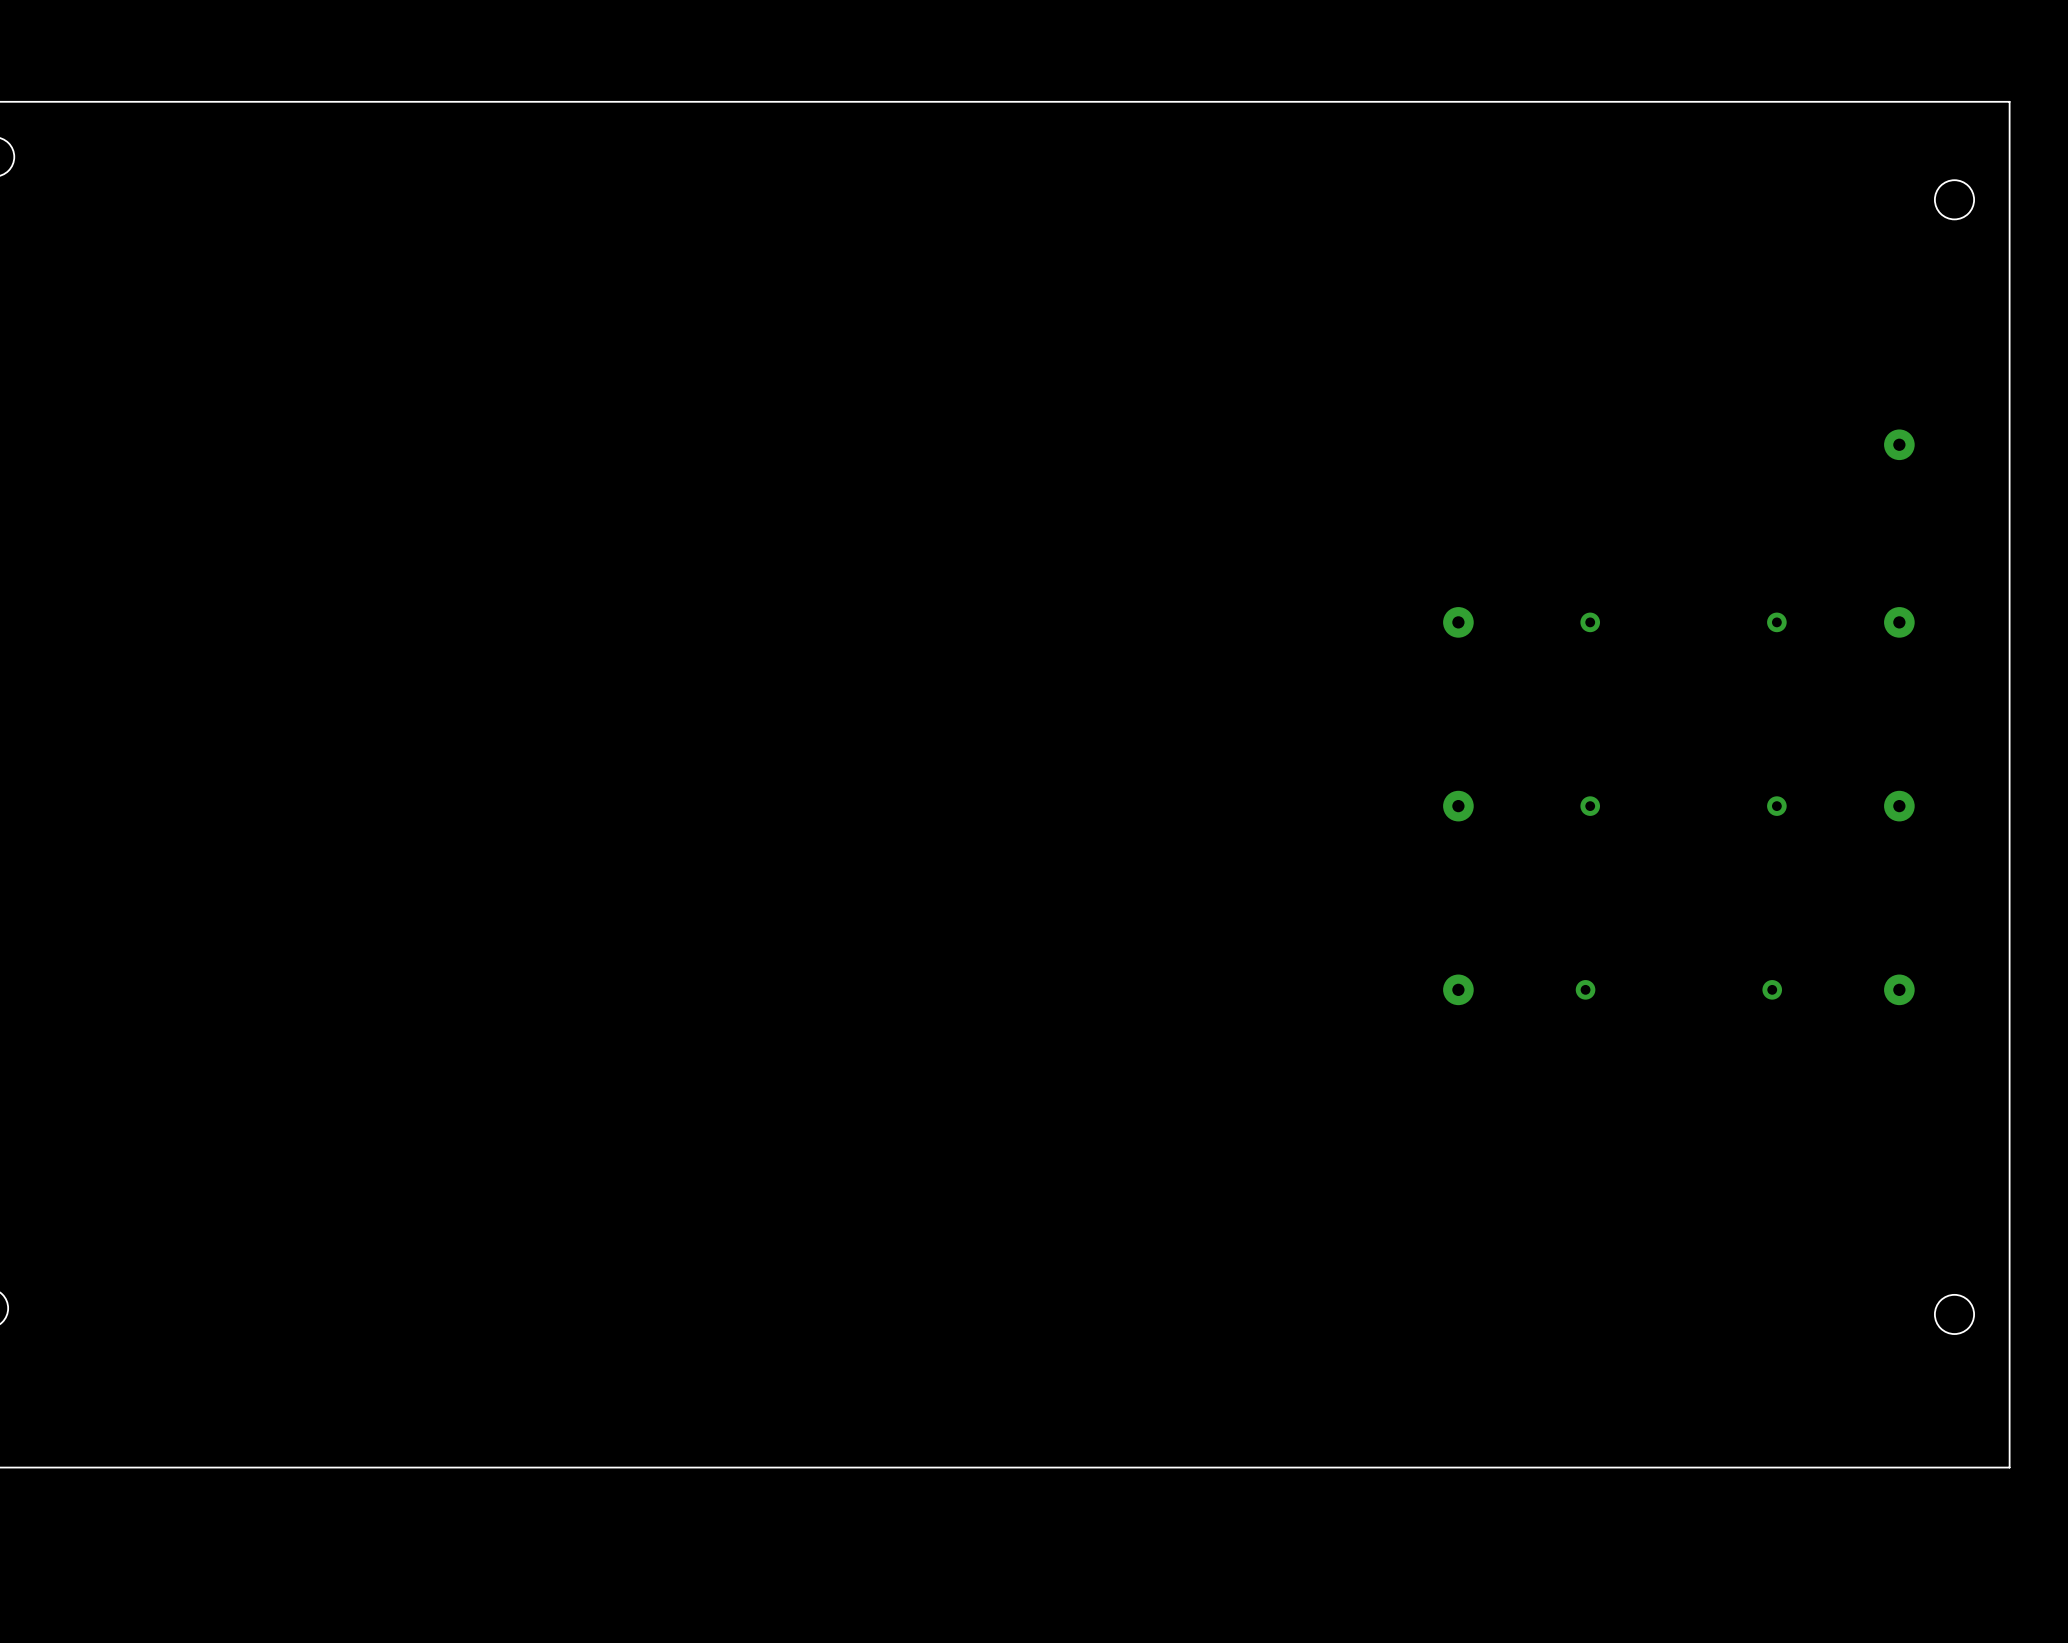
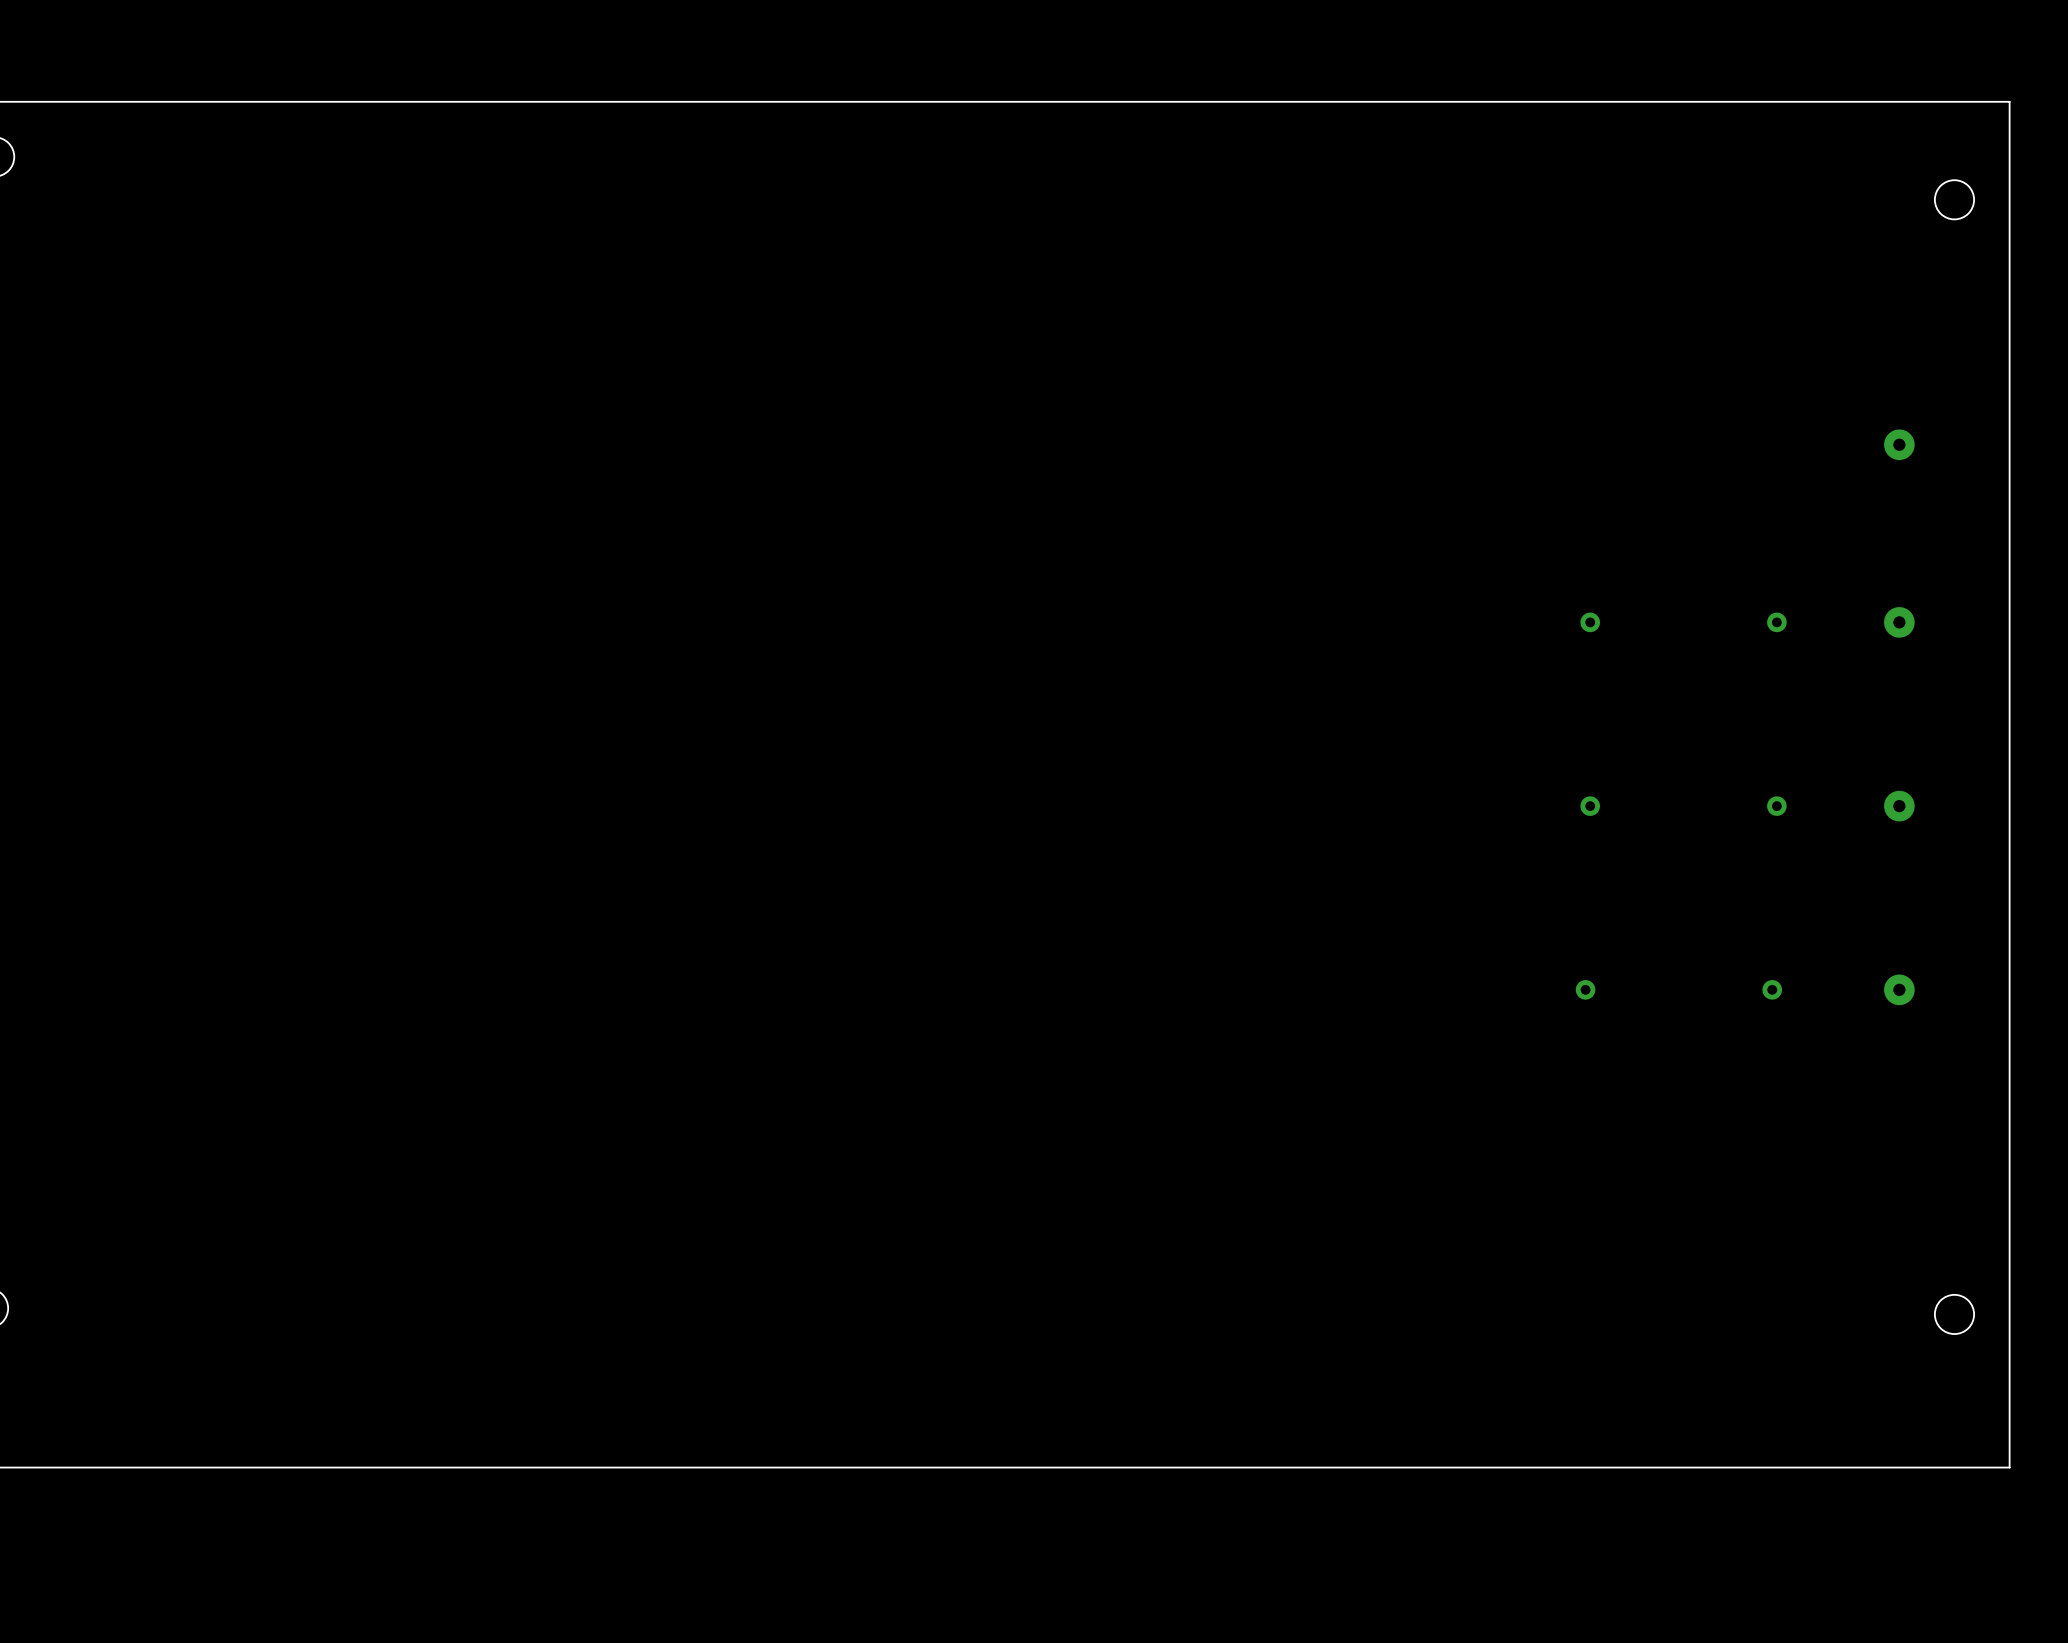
part: (1458, 622) -> none
part: (1458, 806) -> none
part: (1458, 989) -> none

